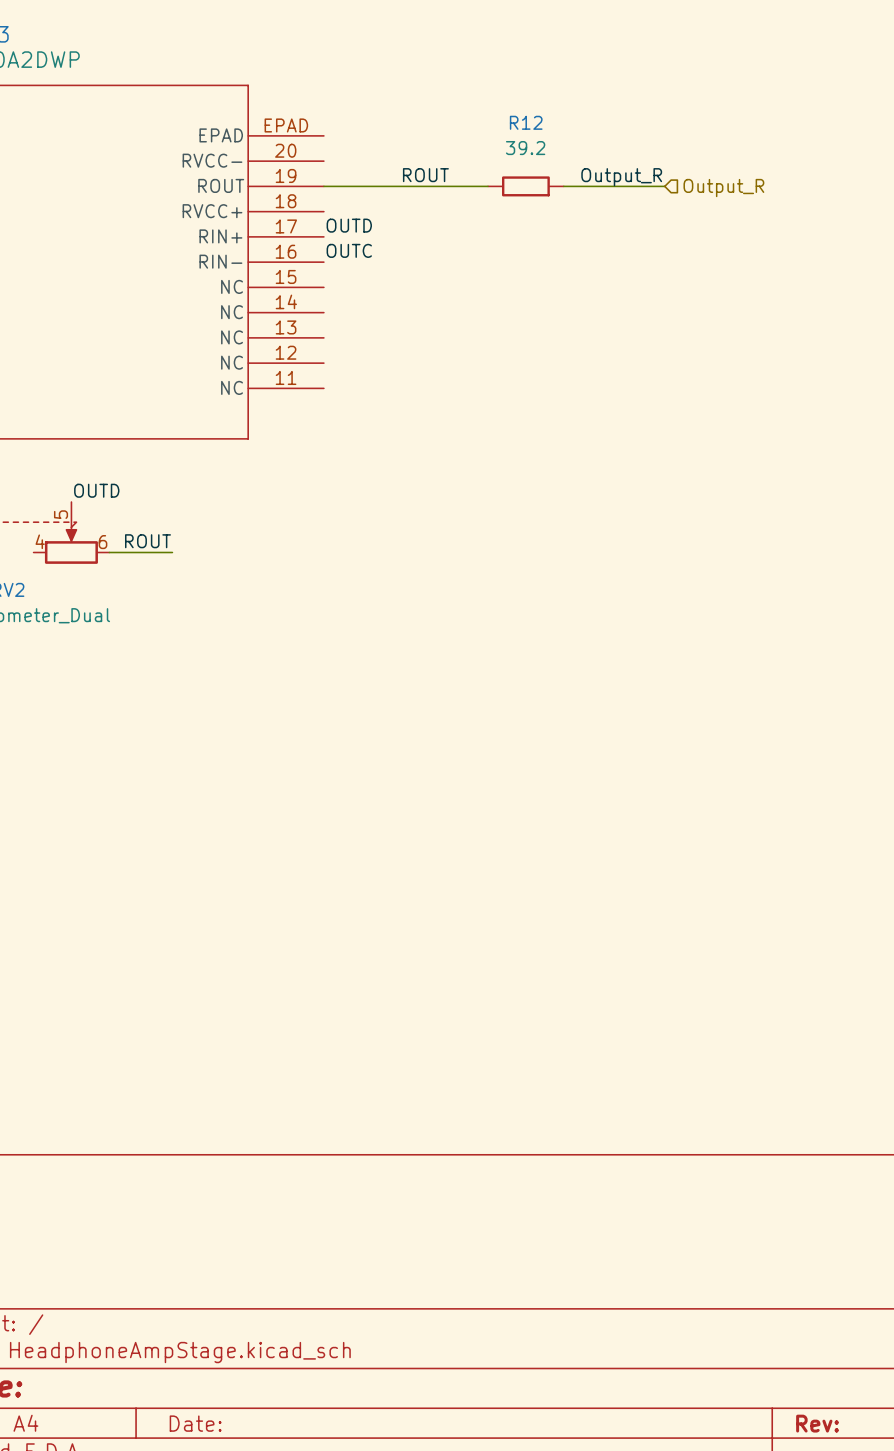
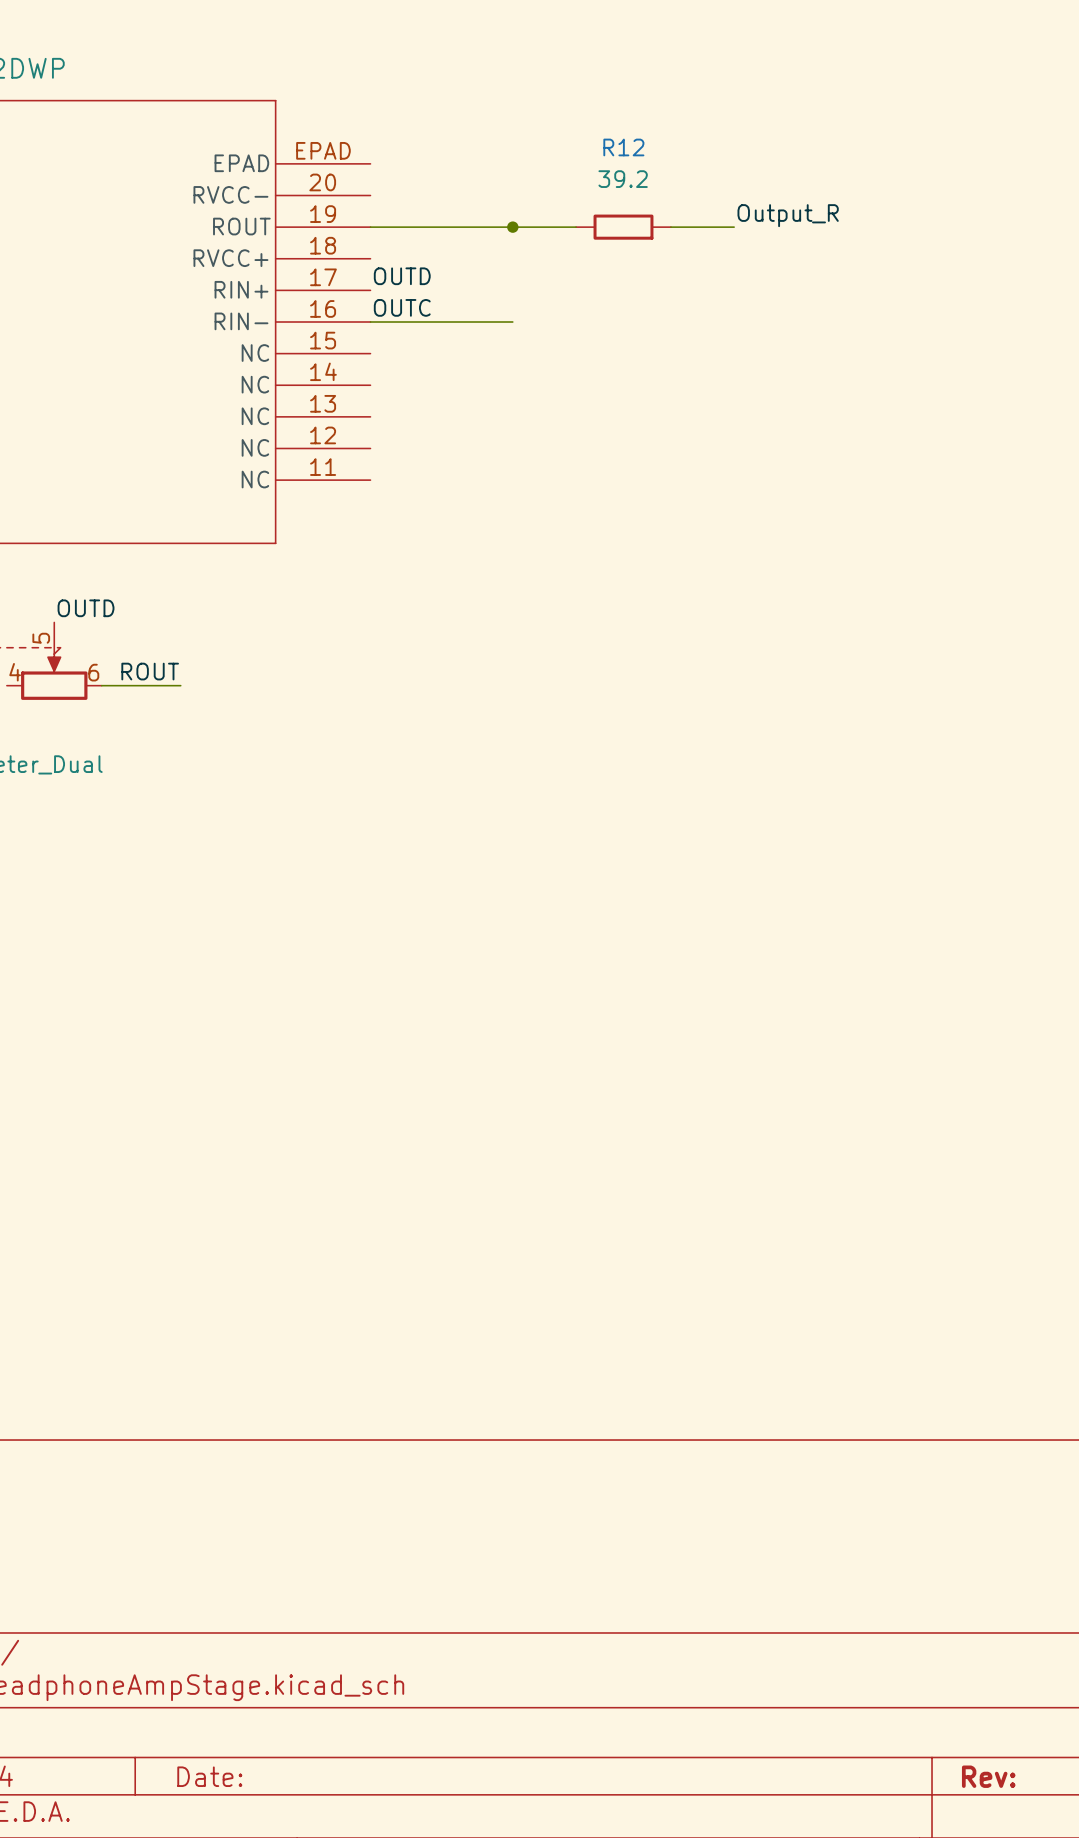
label: ROUT (425, 175) -> none
label position: Output_R (621, 177) -> Output_R (788, 215)
junction: none -> (512, 227)
wire: (614, 186) (664, 186) -> none
hierarchical label: Output_R (723, 188) -> none
wire: none -> (370, 322) (512, 322)

